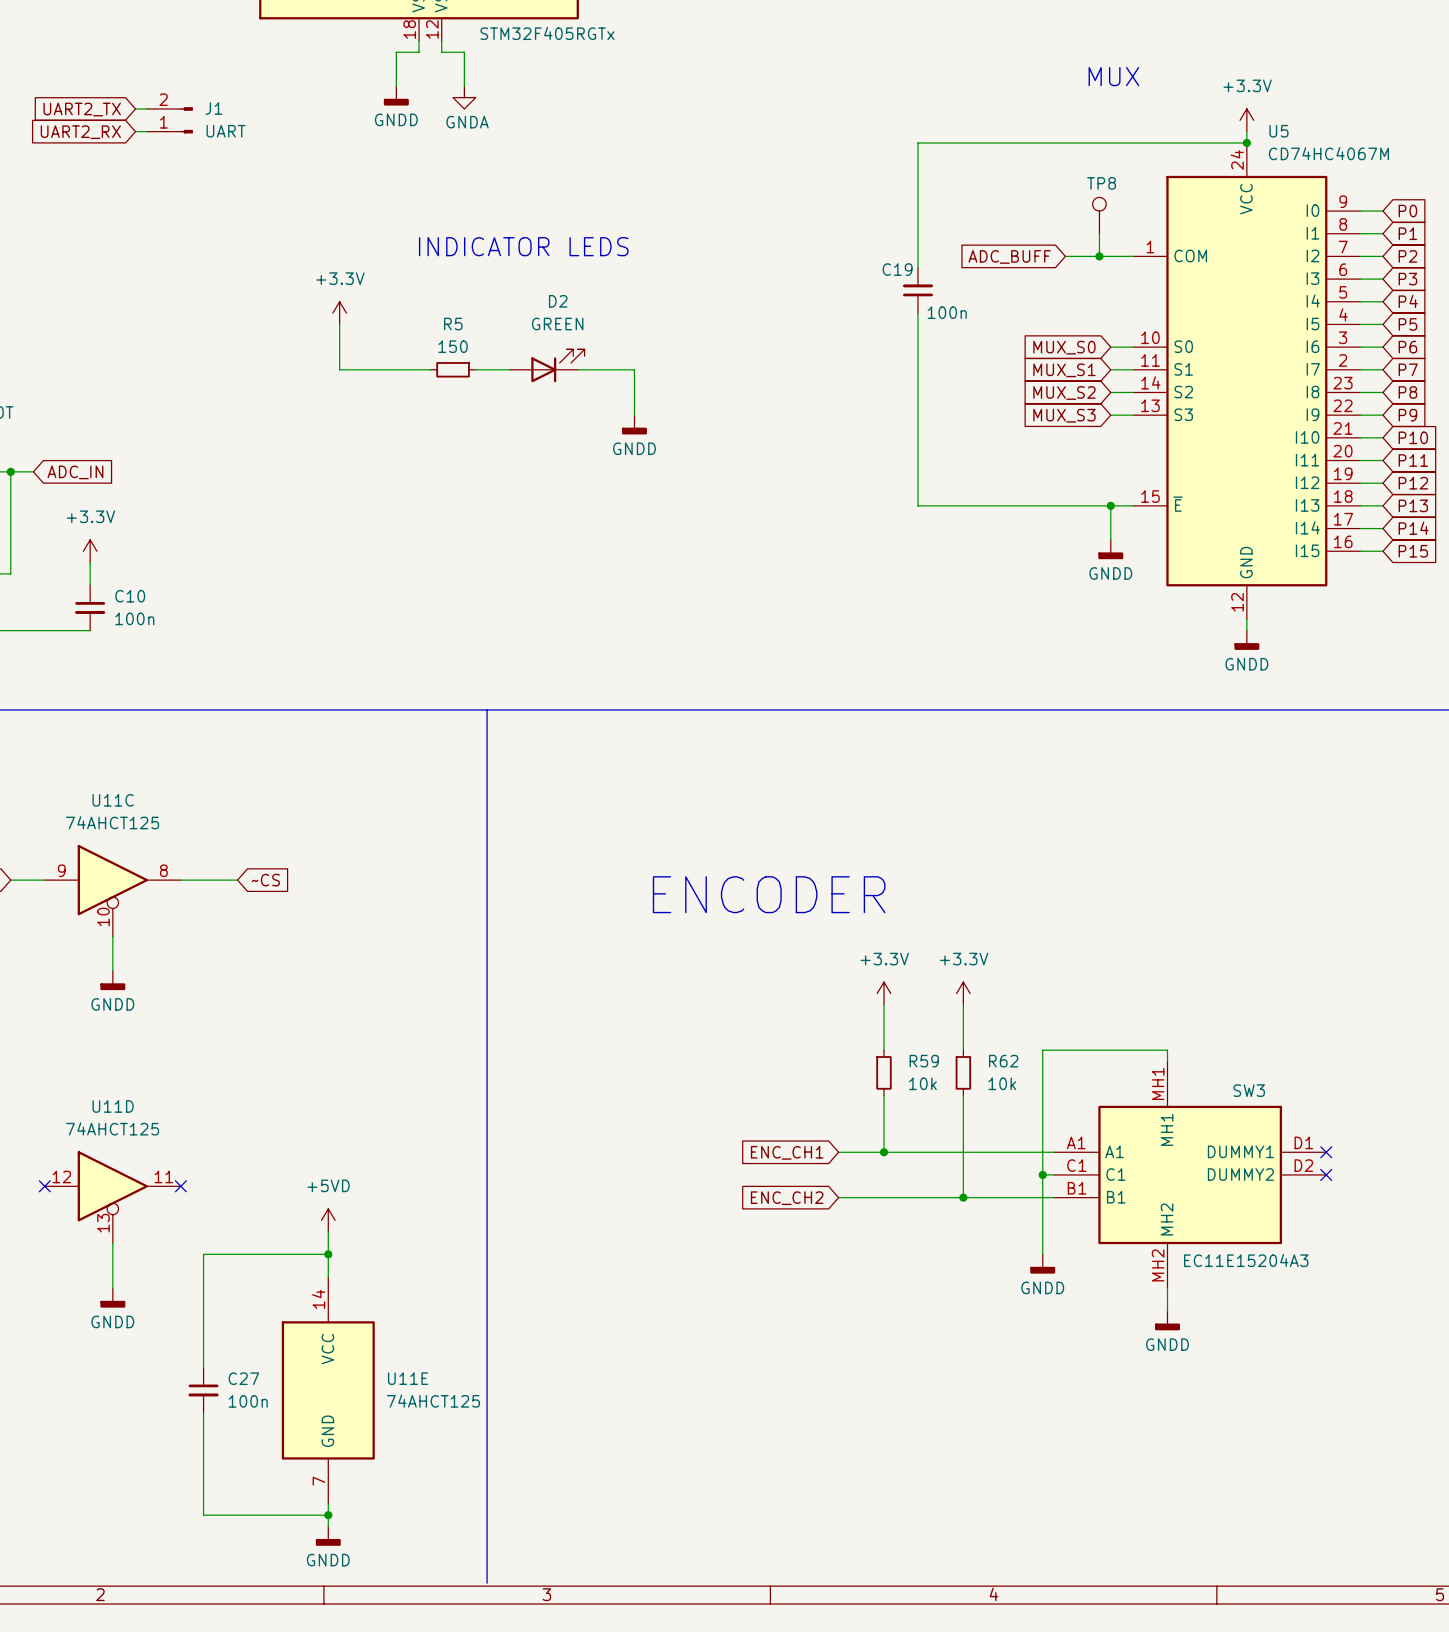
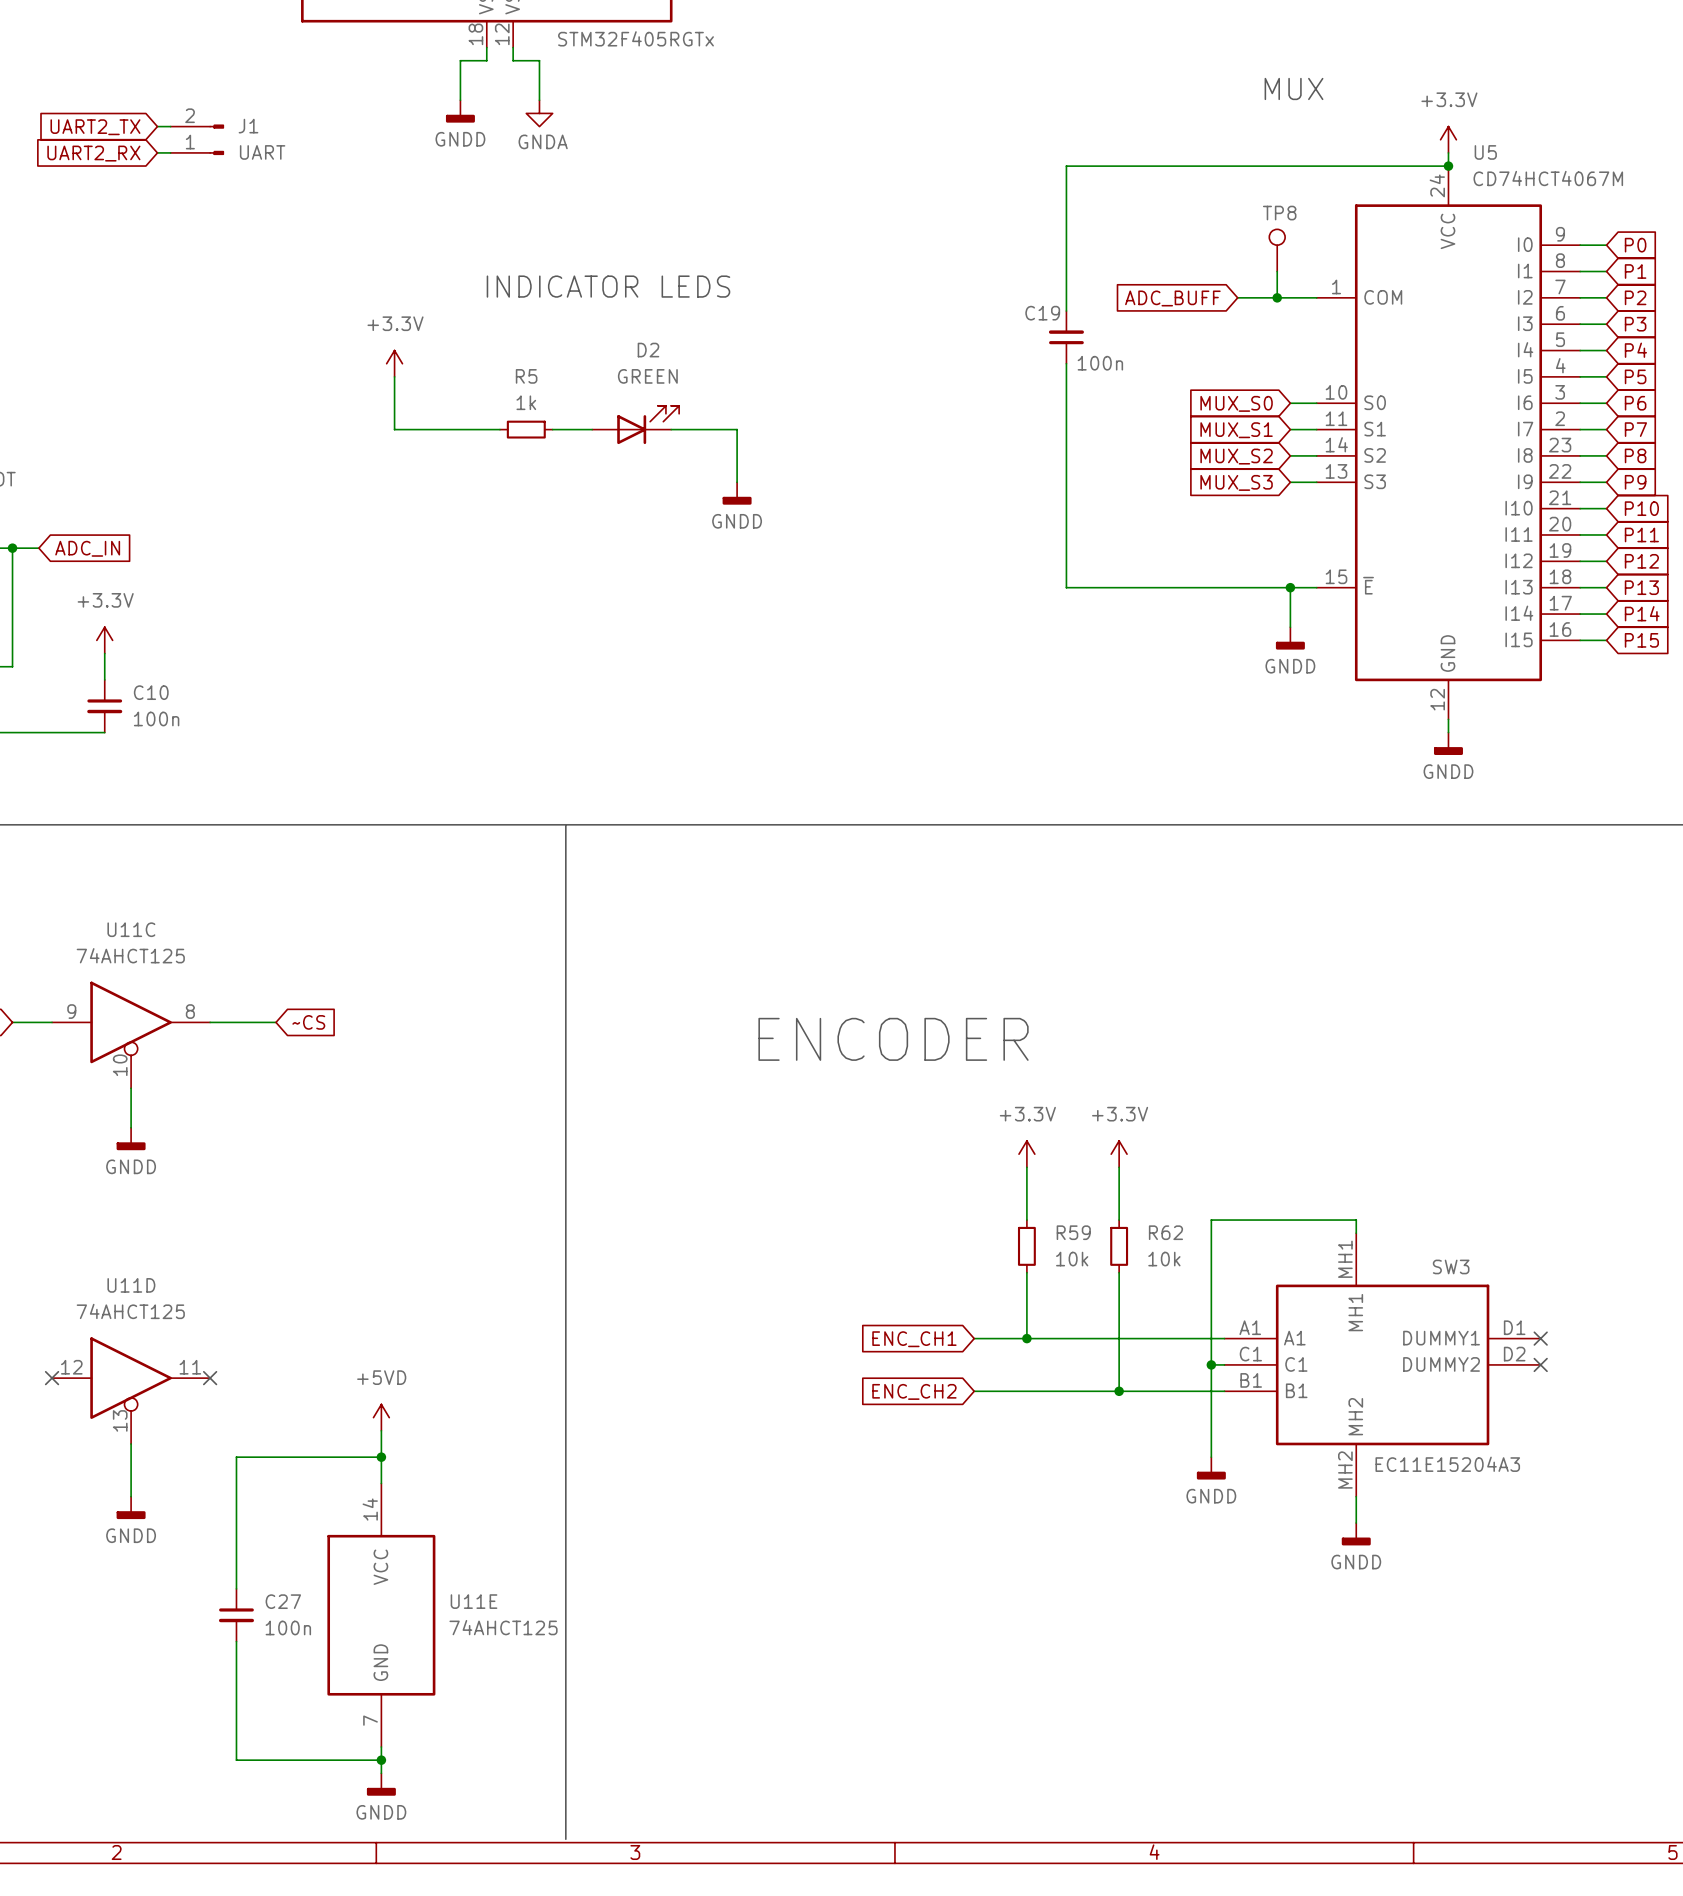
U5 value: CD74HC4067M (1328, 153) -> CD74HCT4067M (1548, 178)
R5 value: 150 (453, 346) -> 1k (526, 402)

